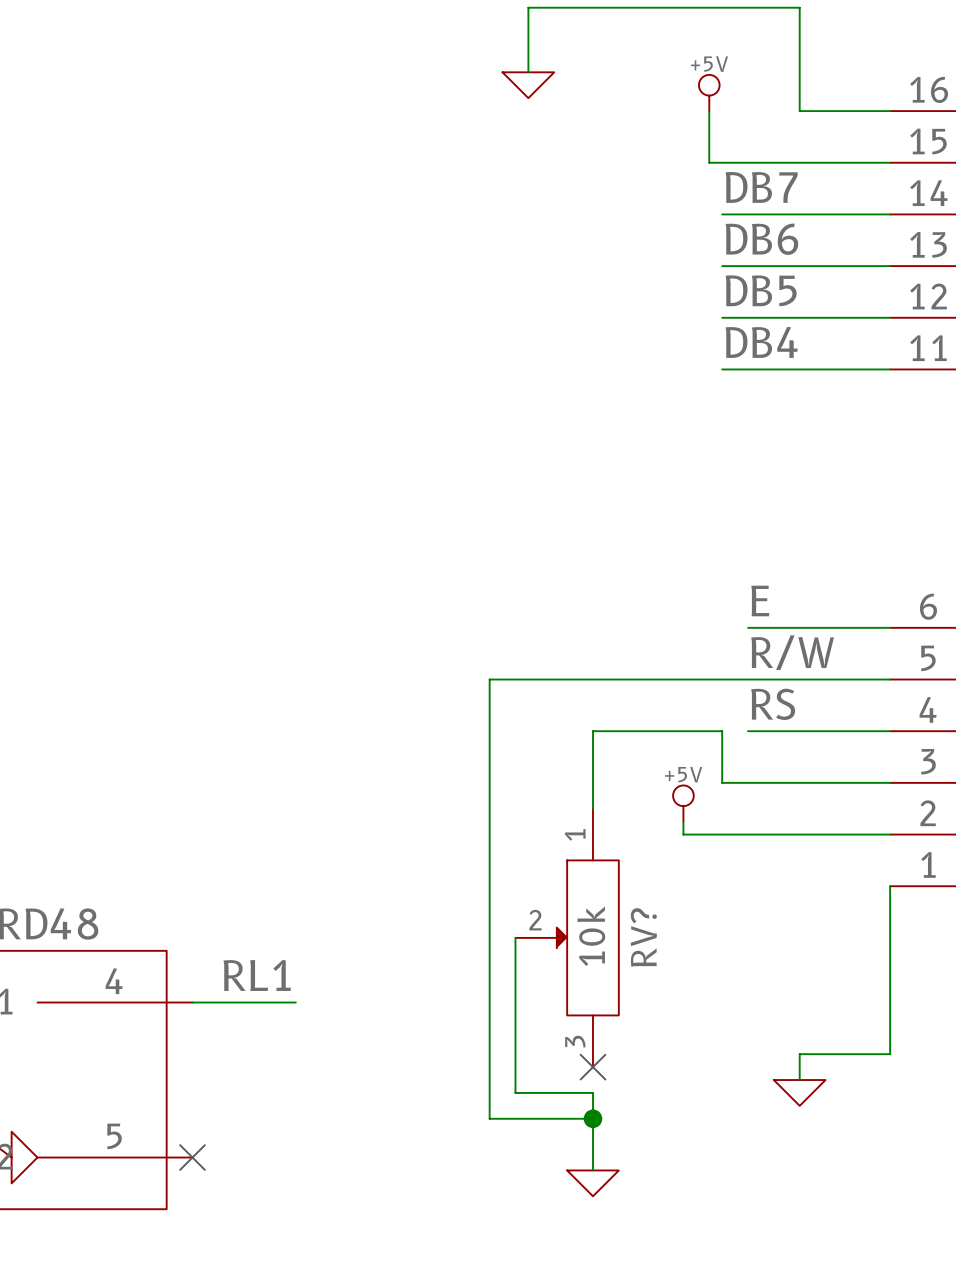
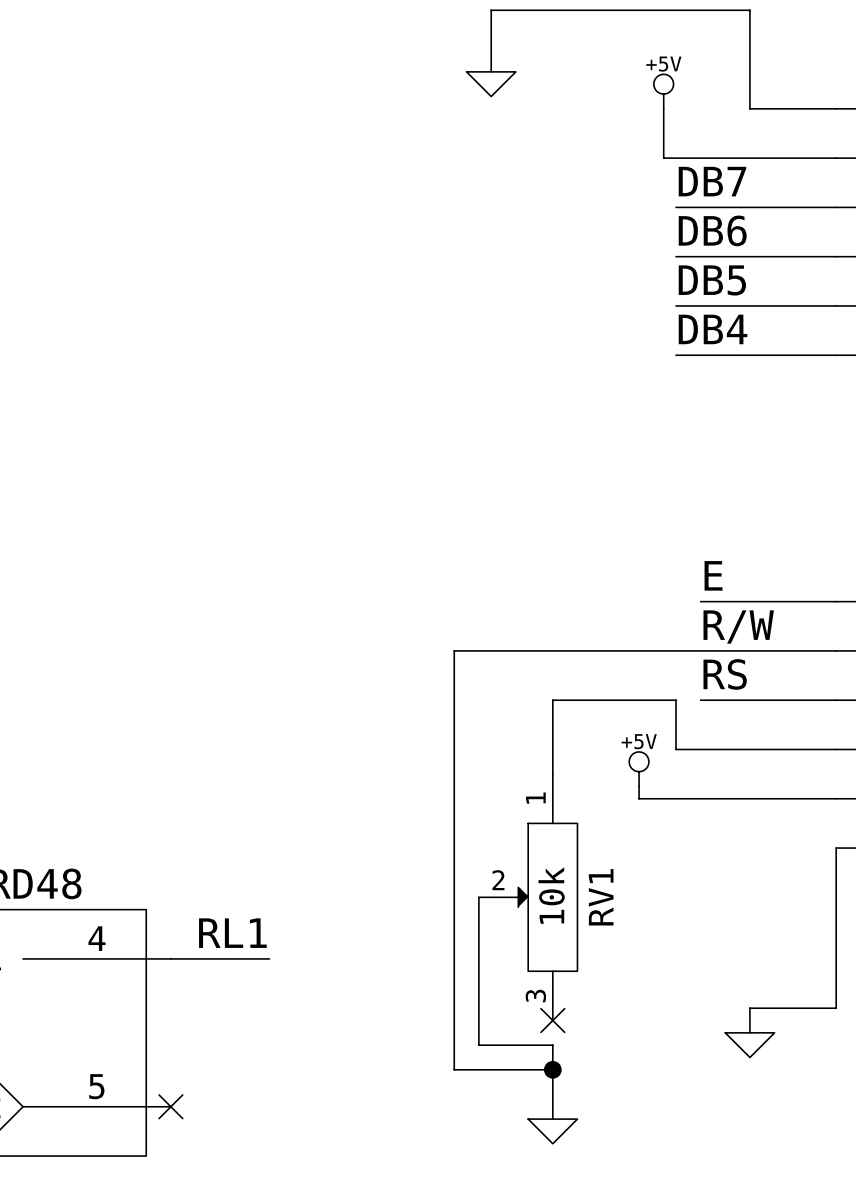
RV? name: RV? (643, 937) -> RV1 (601, 897)

